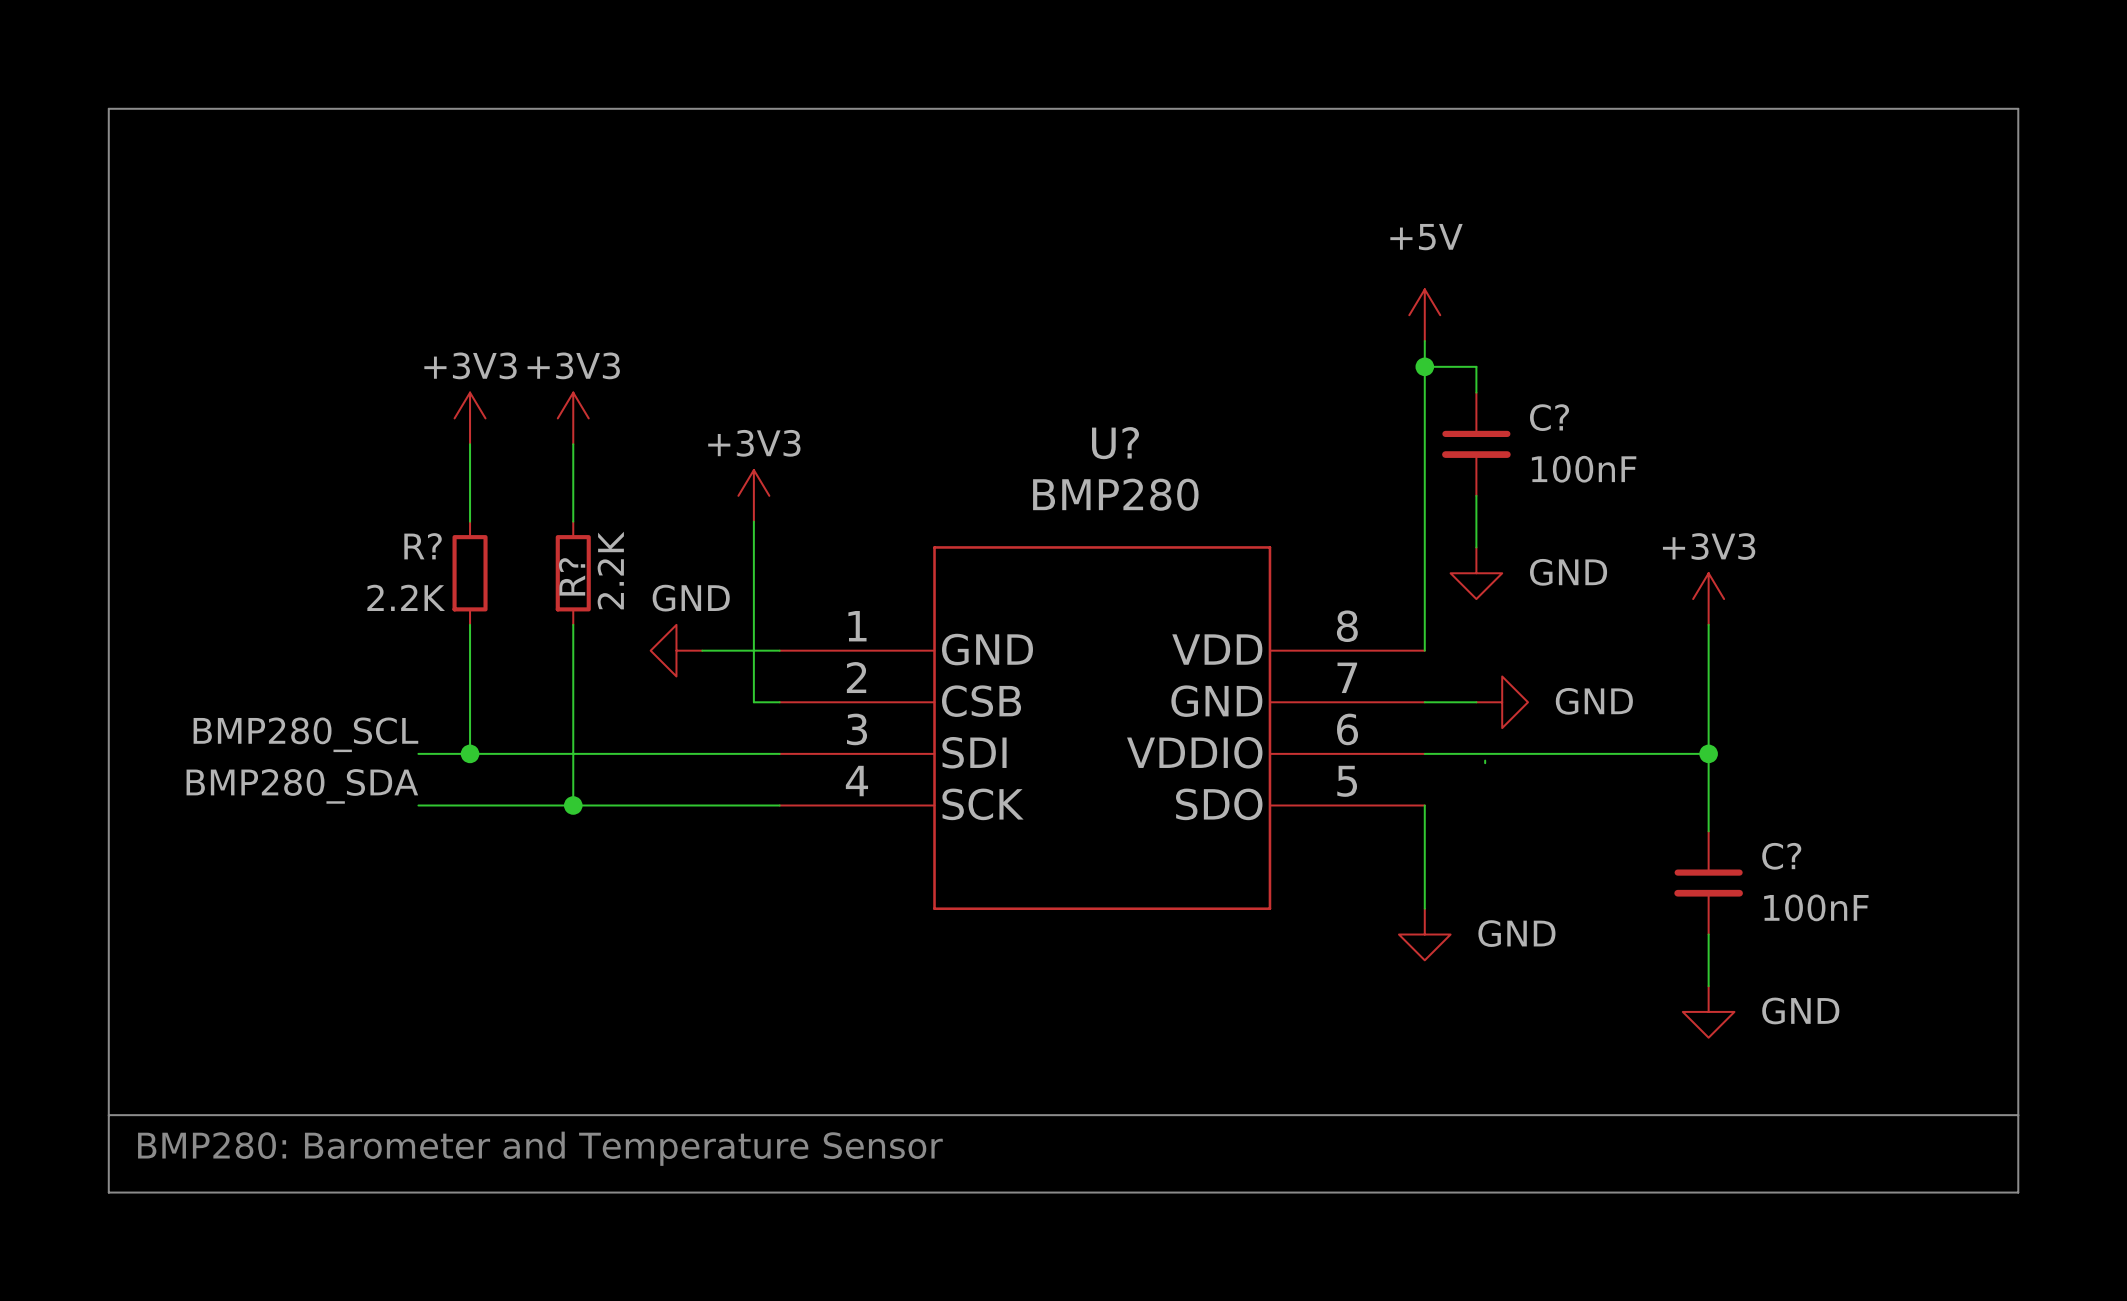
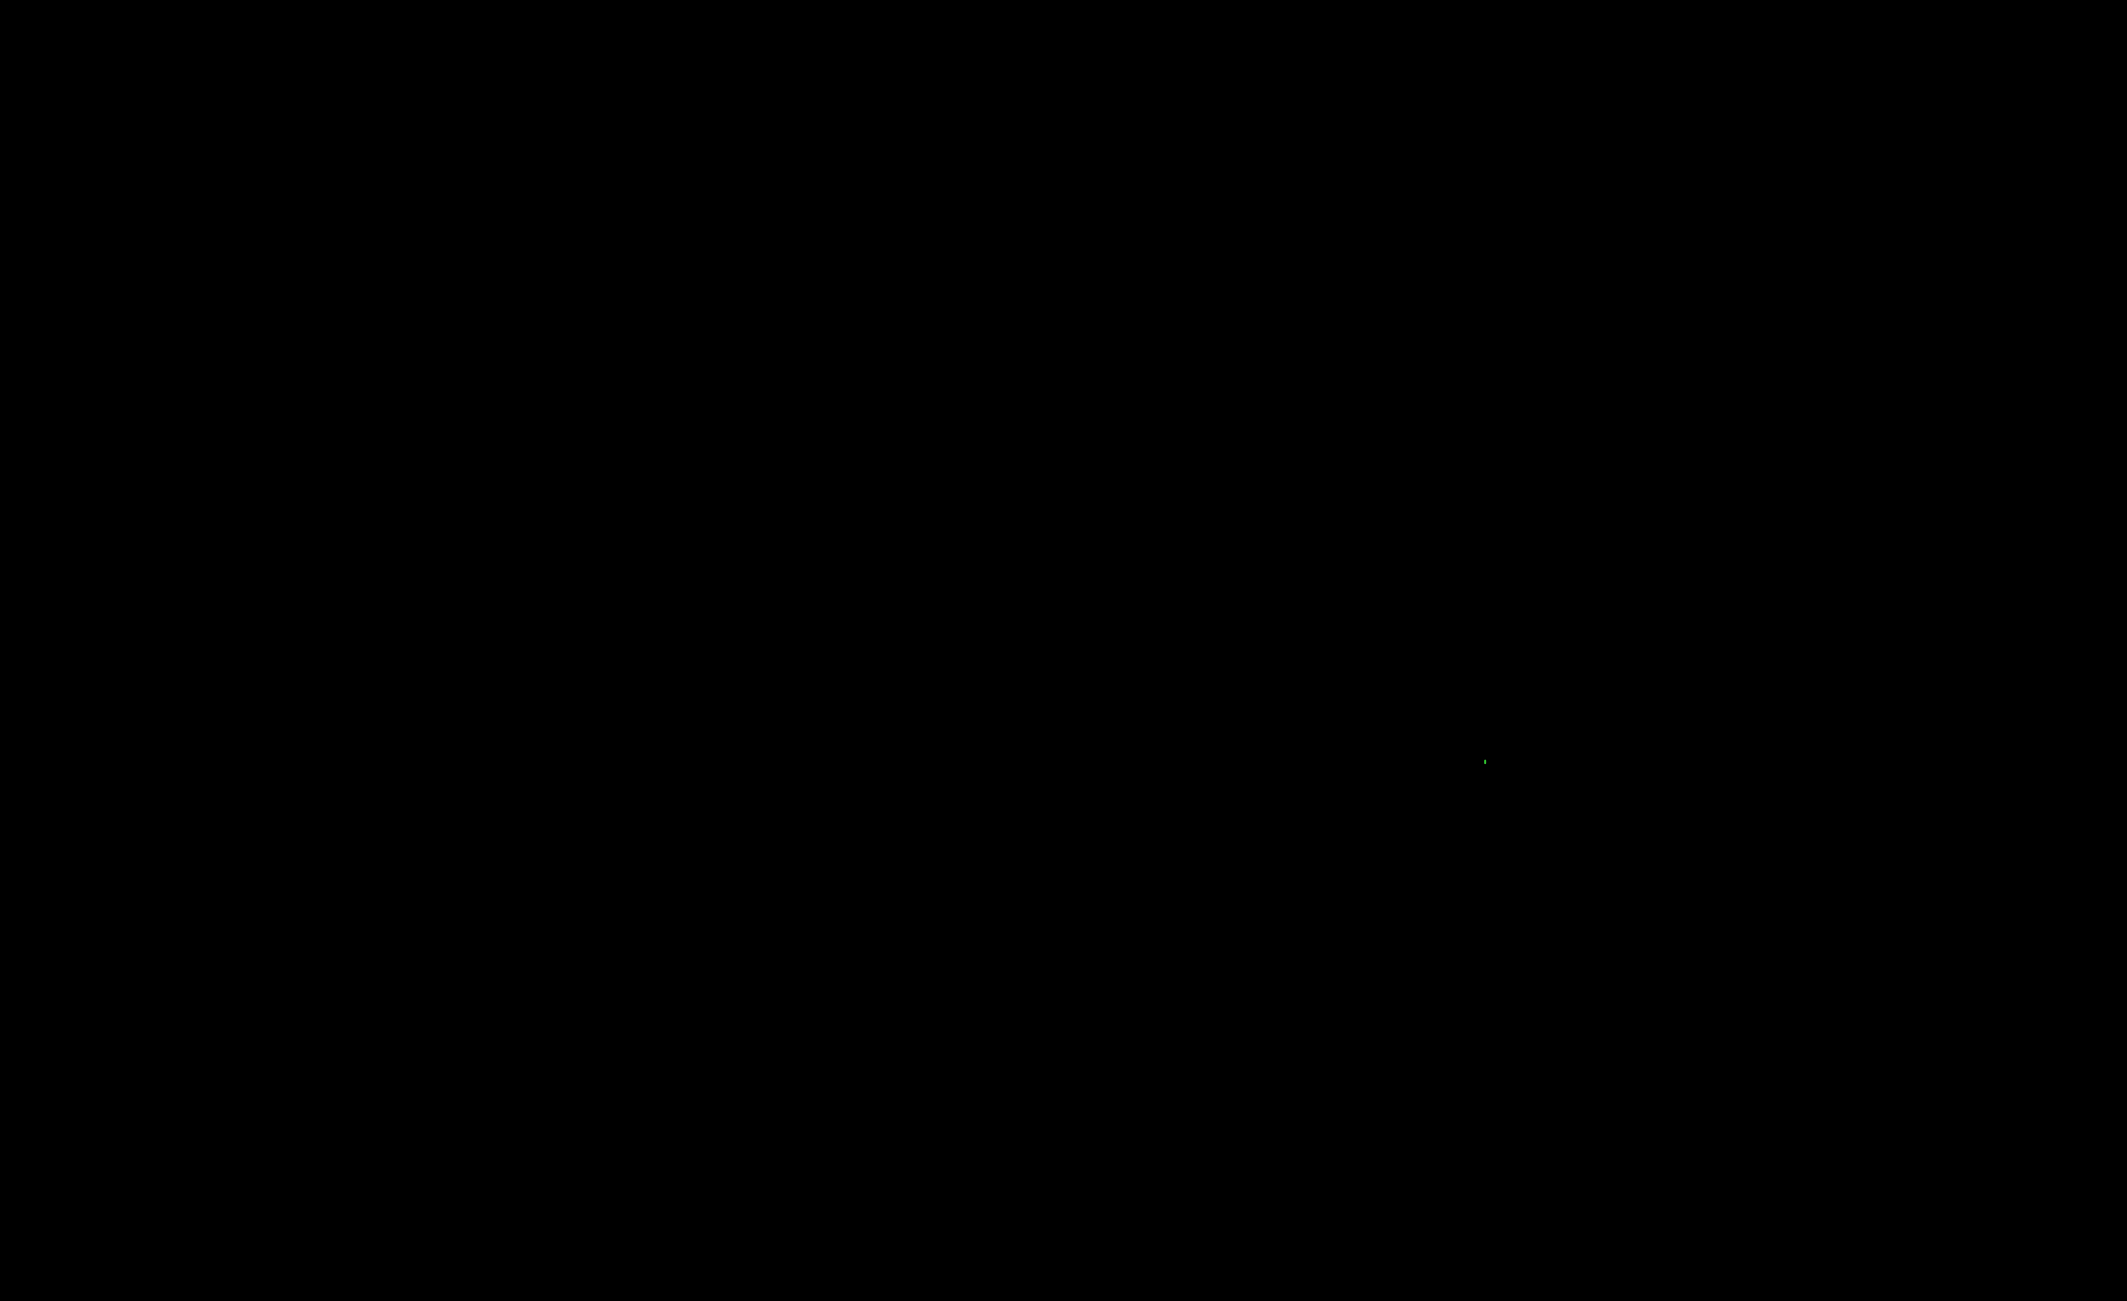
line: (108, 108) (2018, 108) (2018, 1192) (108, 1192) (108, 108) -> none
power symbol: +5V (1424, 315) -> none
wire: (1424, 341) (1424, 650) -> none
wire: (1424, 366) (1476, 366) (1476, 392) -> none
junction: (1424, 366) -> none
power symbol: +3V3 (470, 418) -> none
power symbol: +3V3 (573, 418) -> none
wire: (470, 444) (470, 521) -> none
wire: (573, 444) (573, 521) -> none
C?: 100nF (1476, 444) -> none
power symbol: +3V3 (753, 495) -> none
wire: (1476, 495) (1476, 547) -> none
wire: (753, 521) (753, 702) (779, 702) -> none
R?: 2.2K (470, 573) -> none
R?: 2.2K (573, 573) -> none
power symbol: GND (1476, 573) -> none
power symbol: +3V3 (1708, 599) -> none
wire: (470, 624) (470, 753) -> none
wire: (573, 624) (573, 805) -> none
wire: (1708, 624) (1708, 831) -> none
power symbol: GND (676, 650) -> none
wire: (702, 650) (779, 650) -> none
wire: (1424, 702) (1476, 702) -> none
power symbol: GND (1502, 702) -> none
U?: BMP280 (1102, 728) -> none
label: BMP280_SCL (305, 734) -> none
wire: (418, 753) (779, 753) -> none
junction: (470, 753) -> none
wire: (1424, 753) (1708, 753) -> none
junction: (1708, 753) -> none
label: BMP280_SDA (302, 786) -> none
wire: (418, 805) (779, 805) -> none
junction: (573, 805) -> none
wire: (1424, 805) (1424, 908) -> none
C?: 100nF (1708, 882) -> none
power symbol: GND (1424, 934) -> none
wire: (1708, 934) (1708, 986) -> none
power symbol: GND (1708, 1011) -> none
line: (108, 1115) (2018, 1115) -> none
text: BMP280: Barometer and Temperature Sensor (540, 1148) -> none

